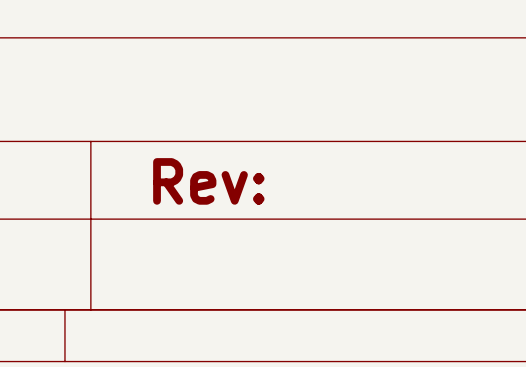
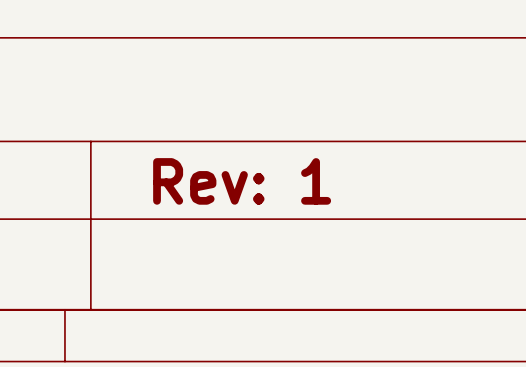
title block: Rev: (208, 181) -> Rev: 1 (242, 181)

